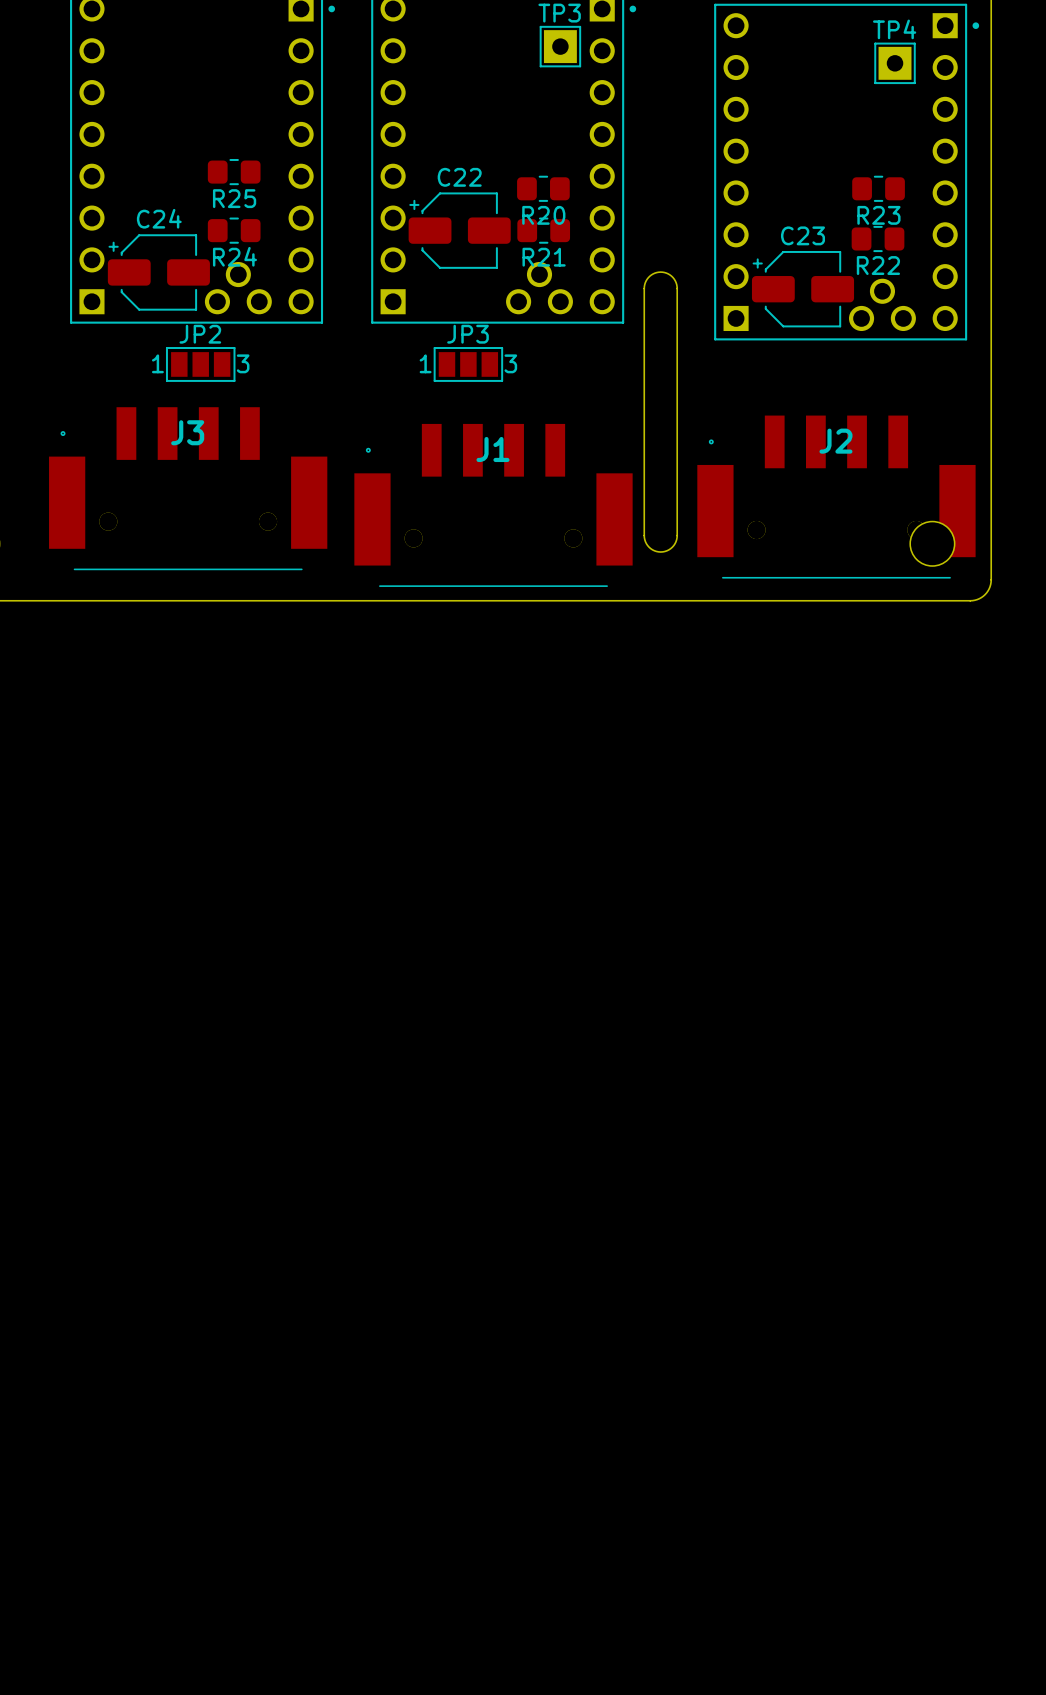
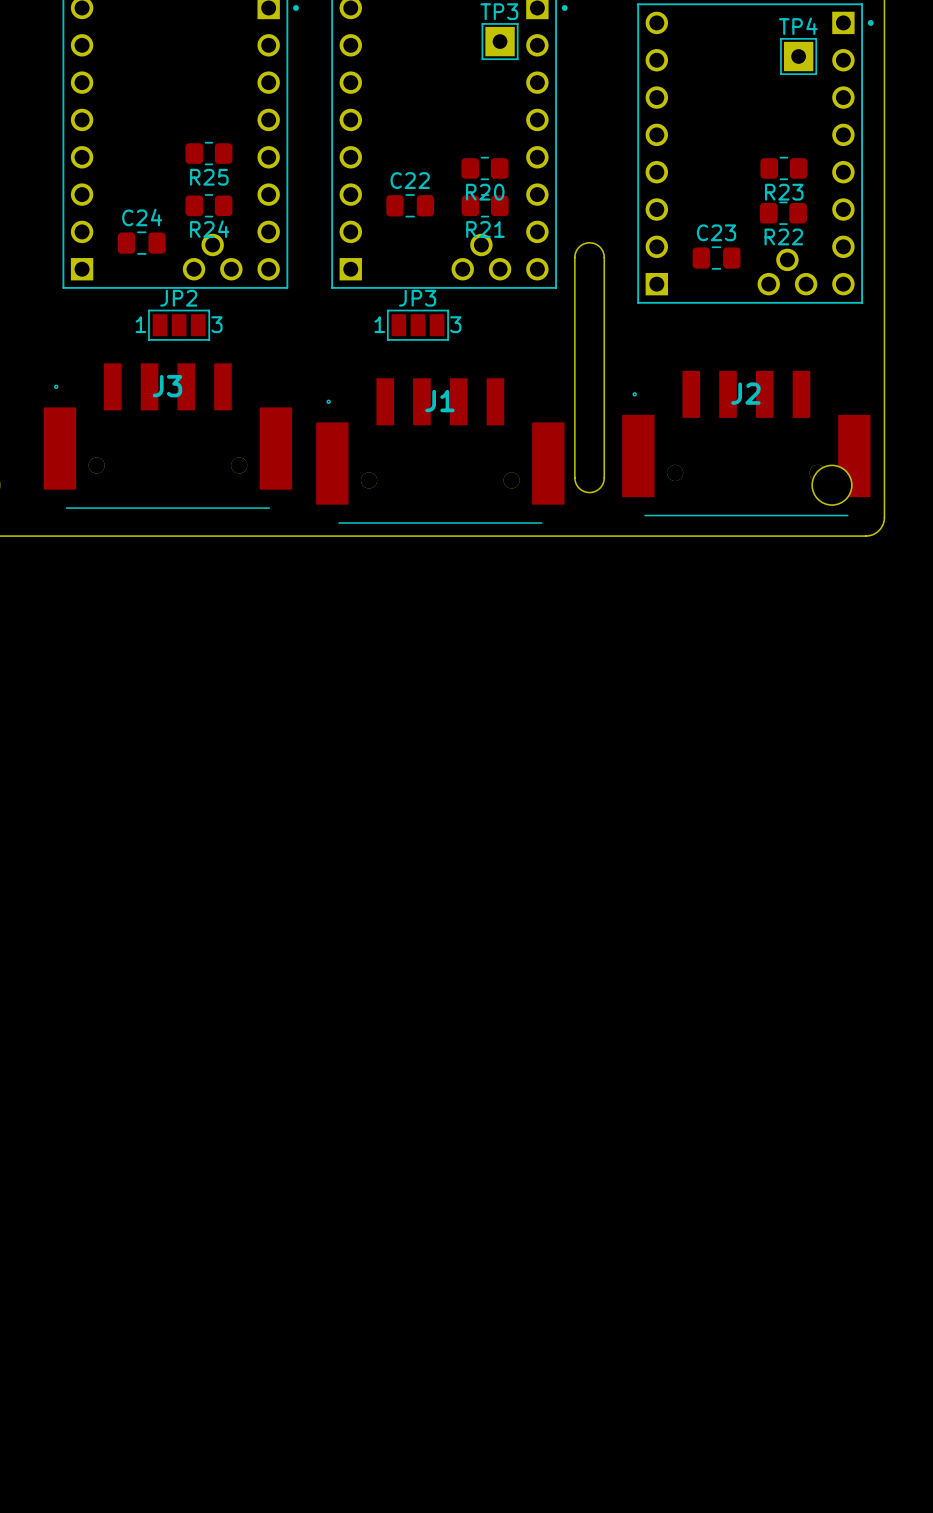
C22 footprint: [408, 192, 511, 269] -> [386, 194, 435, 218]
C24 footprint: [107, 234, 210, 311] -> [117, 231, 166, 255]
C23 footprint: [751, 250, 855, 328] -> [692, 246, 741, 270]

